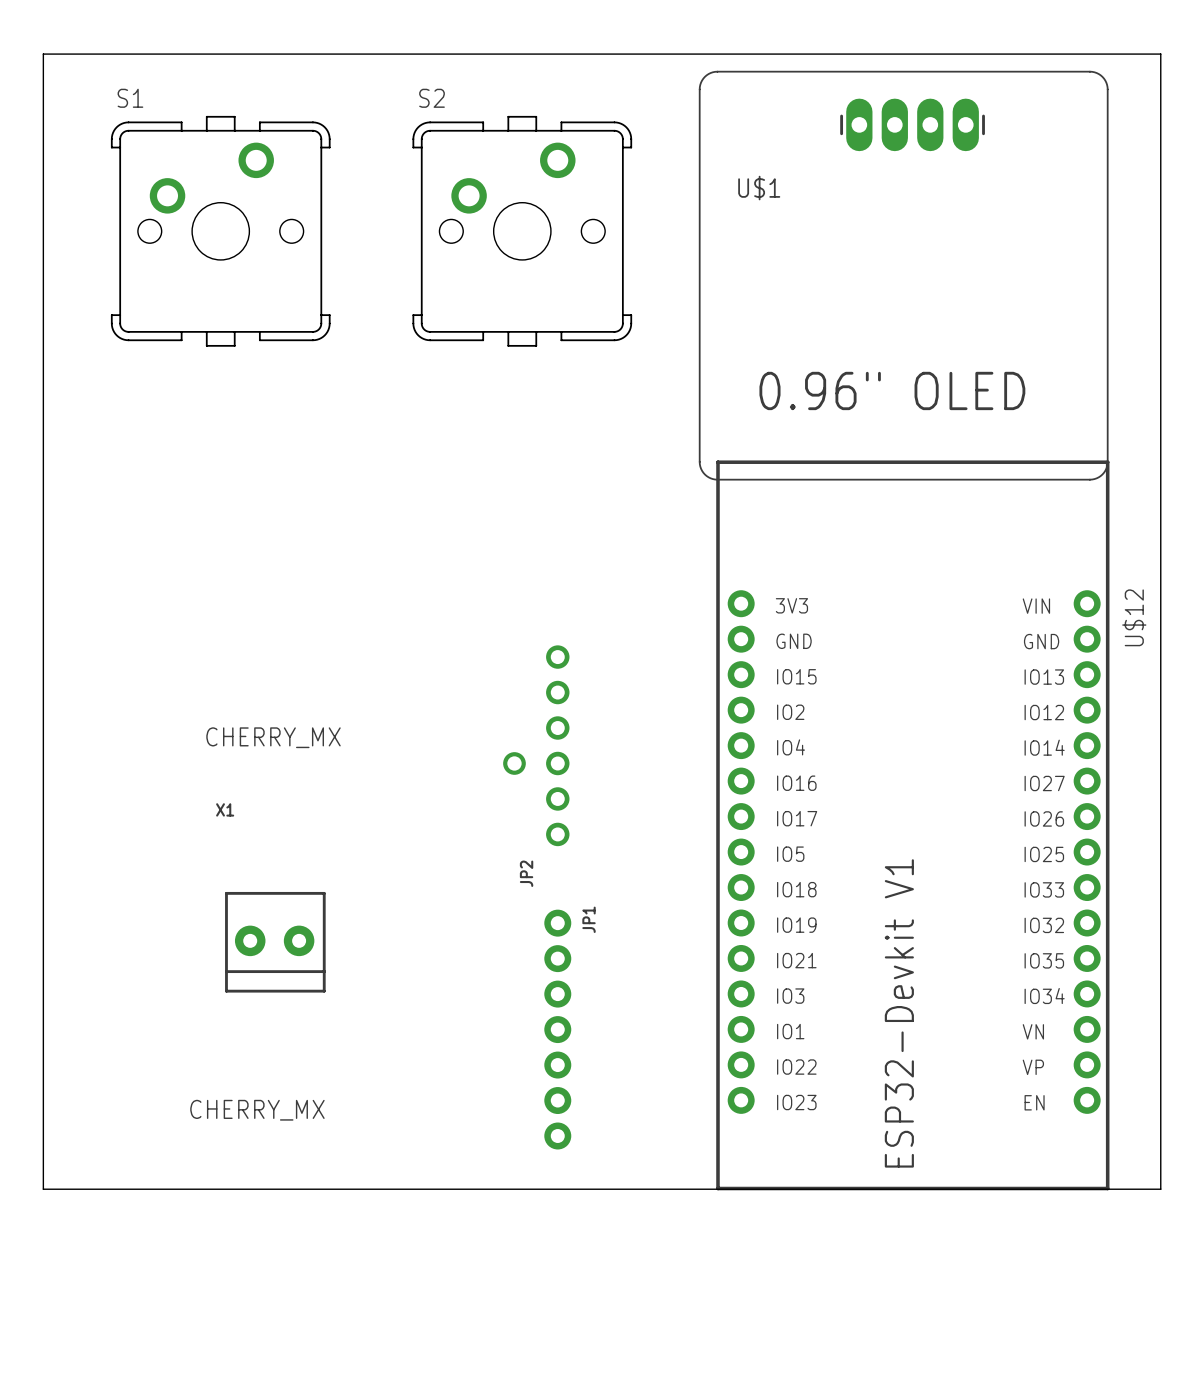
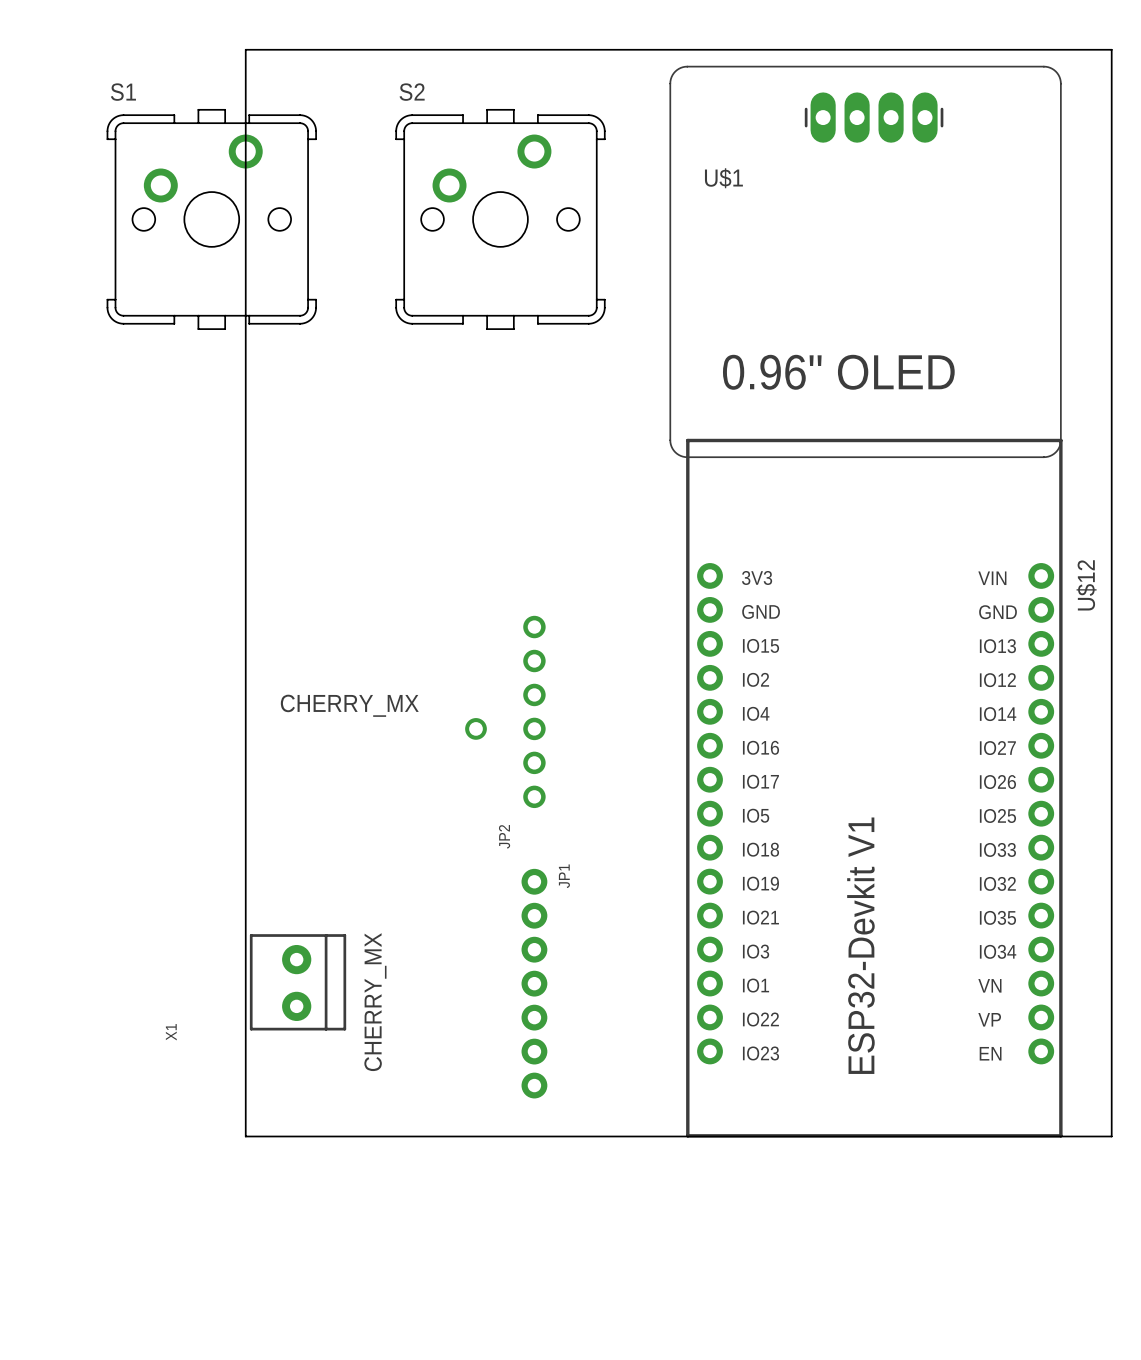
board edge: (256, 54) (43, 54) (43, 1189) (256, 1189) -> (245, 49) (245, 1136)
S1 value position: CHERRY_MX (273, 737) -> CHERRY_MX (349, 705)
part position: (514, 763) -> (476, 728)
X1 rotation: 0° (275, 942) -> 90° counterclockwise (298, 982)
X1 position: (275, 942) -> (298, 982)
S2 value rotation: 0° (257, 1110) -> 90° counterclockwise (375, 1002)

